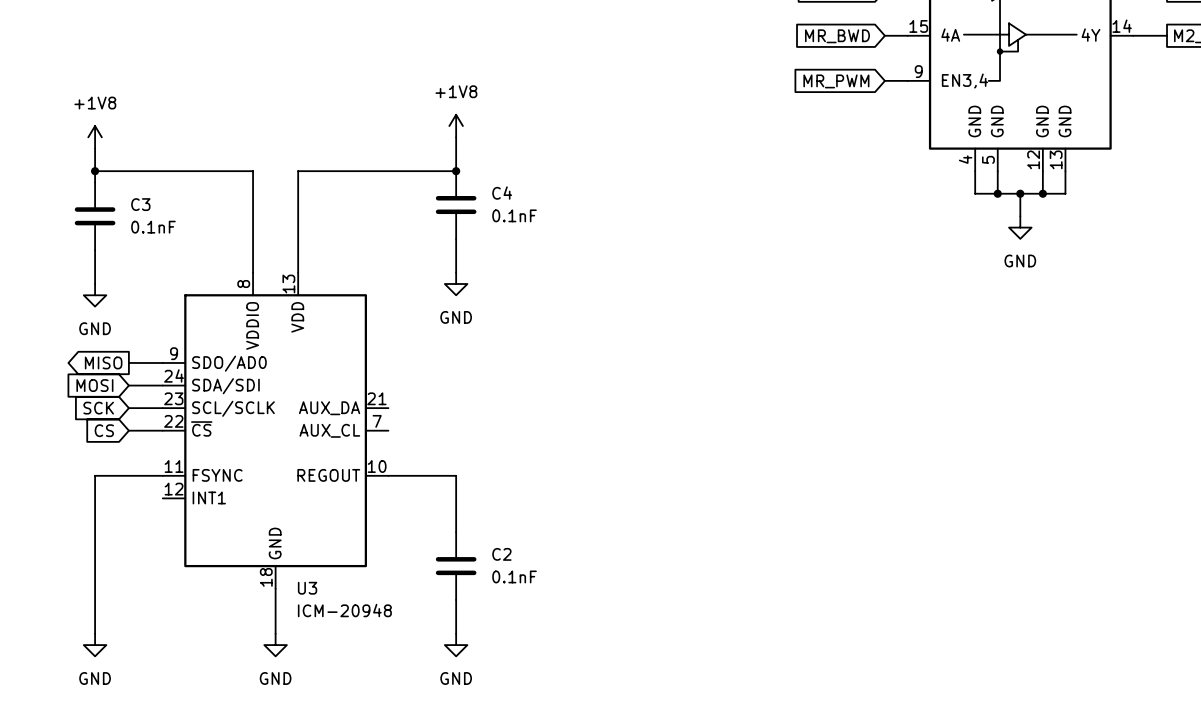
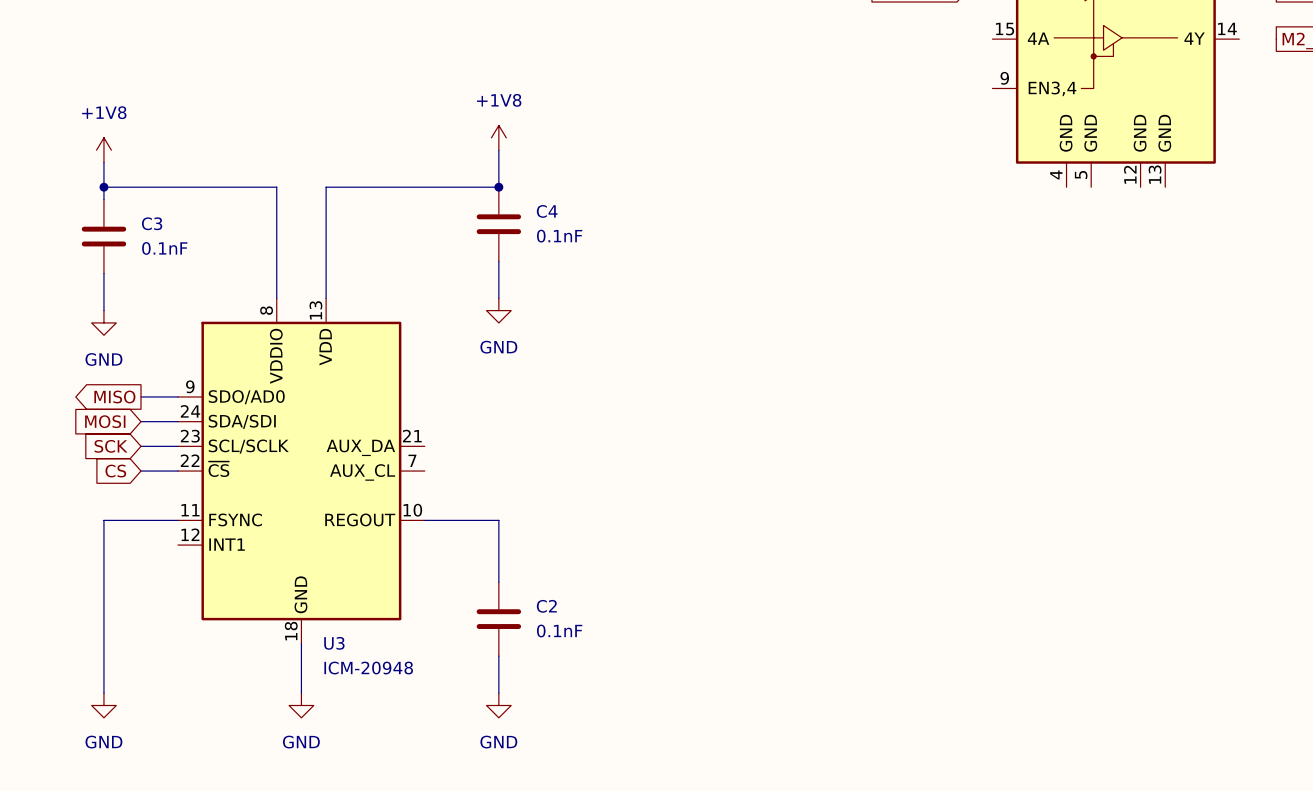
wire: (884, 35) (907, 35) -> none
wire: (1133, 35) (1167, 35) -> none
global label: MR_BWD (837, 36) -> none
wire: (884, 80) (907, 80) -> none
global label: MR_PWM (836, 81) -> none
wire: (975, 171) (975, 193) (1065, 193) (1065, 171) -> none
wire: (997, 171) (997, 193) -> none
wire: (1042, 171) (1042, 193) -> none
junction: (997, 193) -> none
wire: (1020, 193) (1020, 216) -> none
junction: (1020, 193) -> none
junction: (1042, 193) -> none
power symbol: GND (1020, 227) -> none

